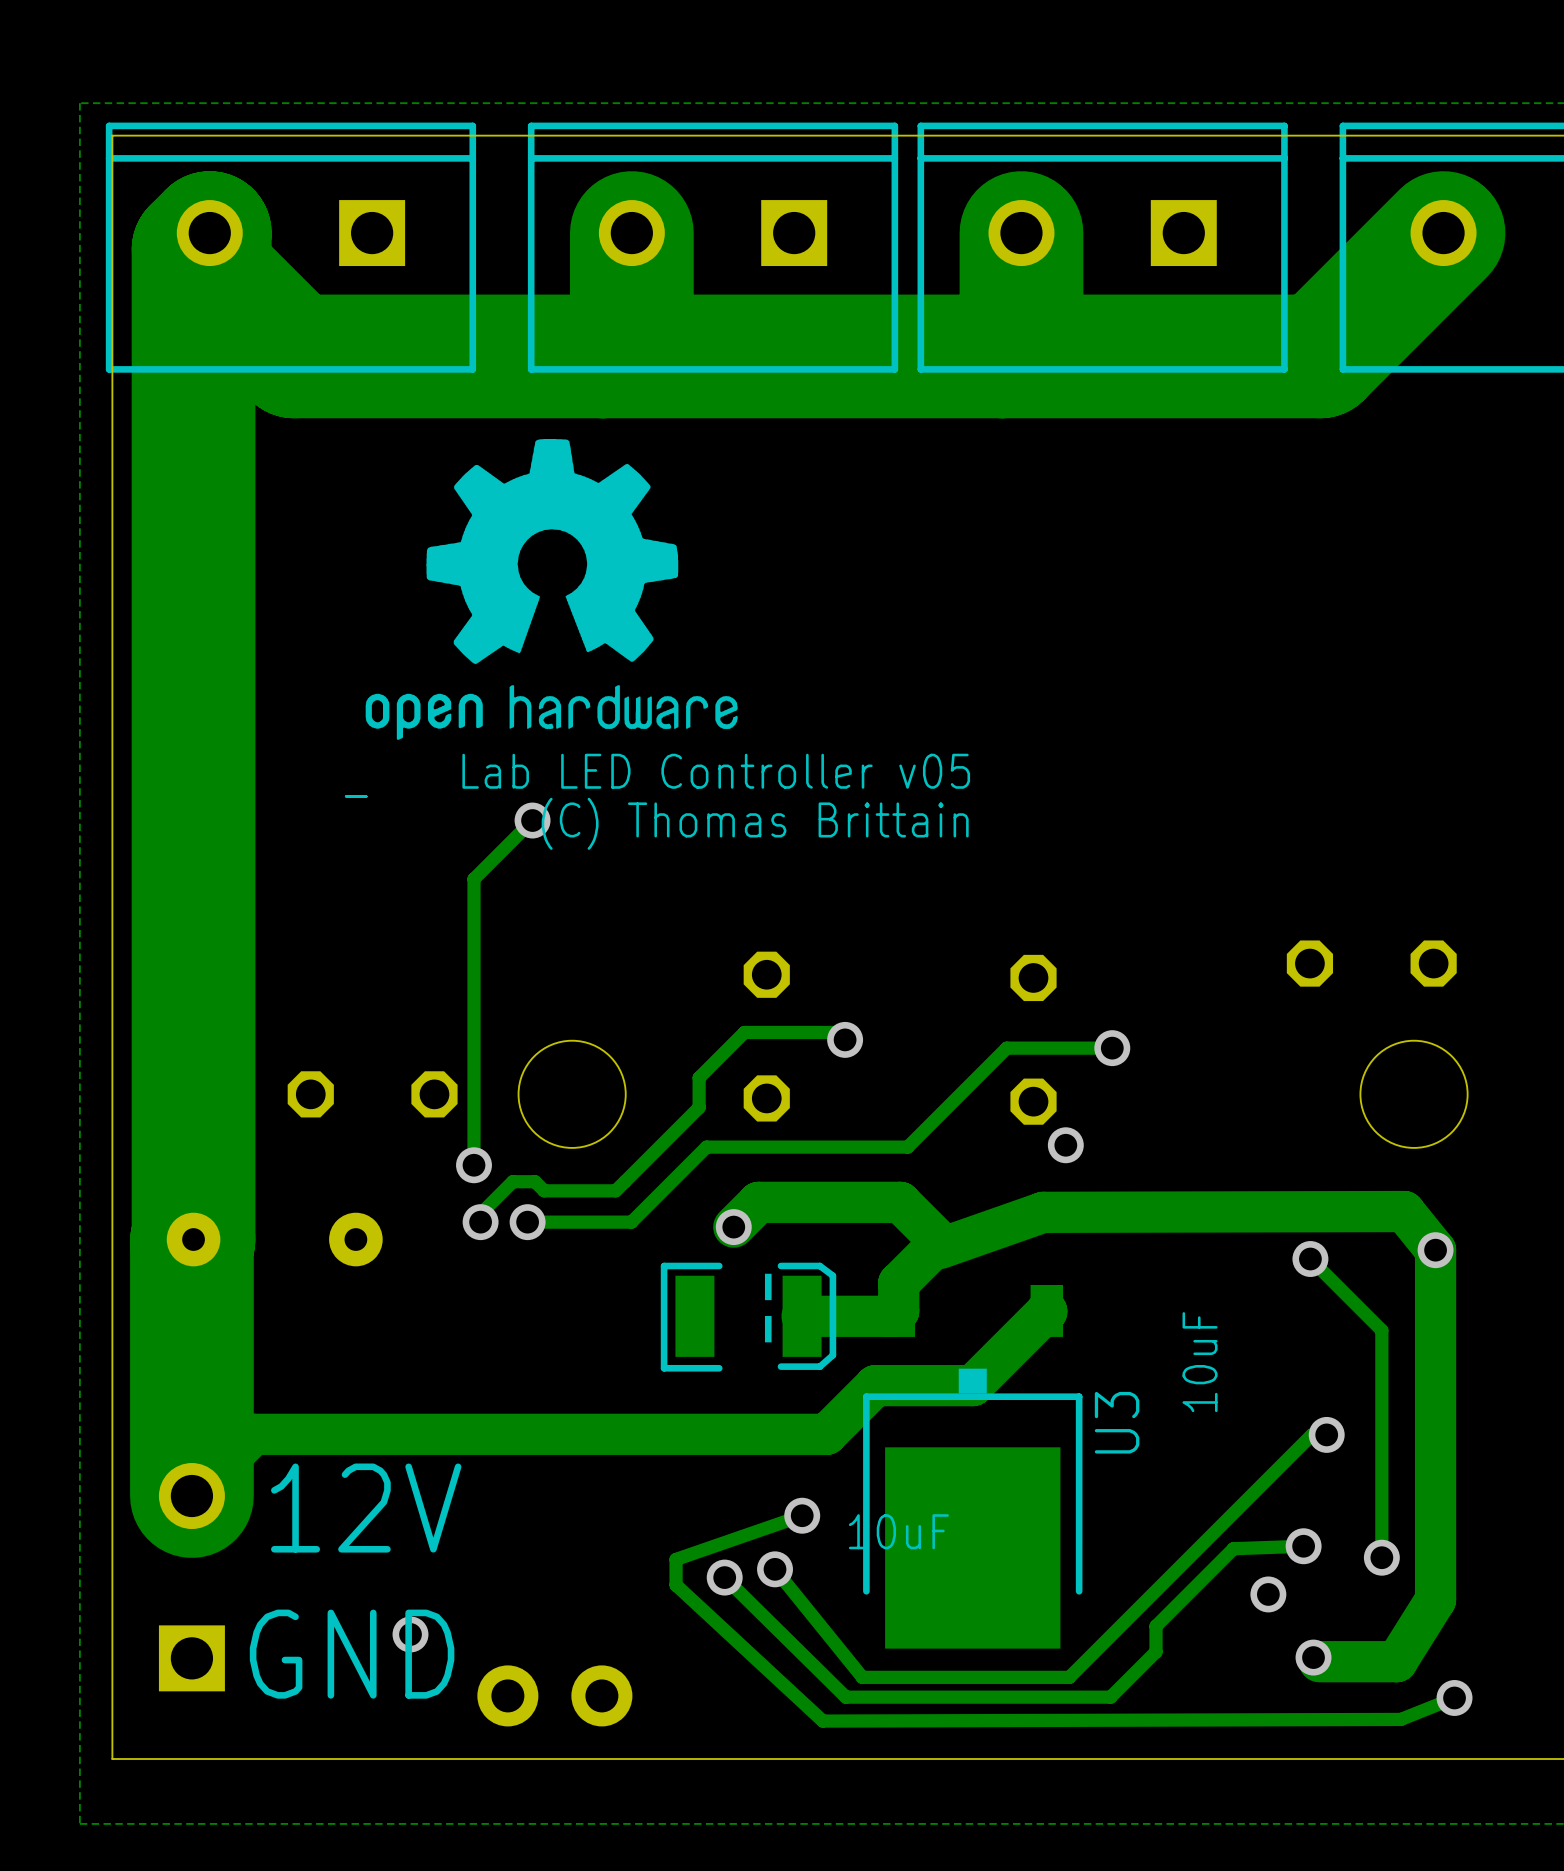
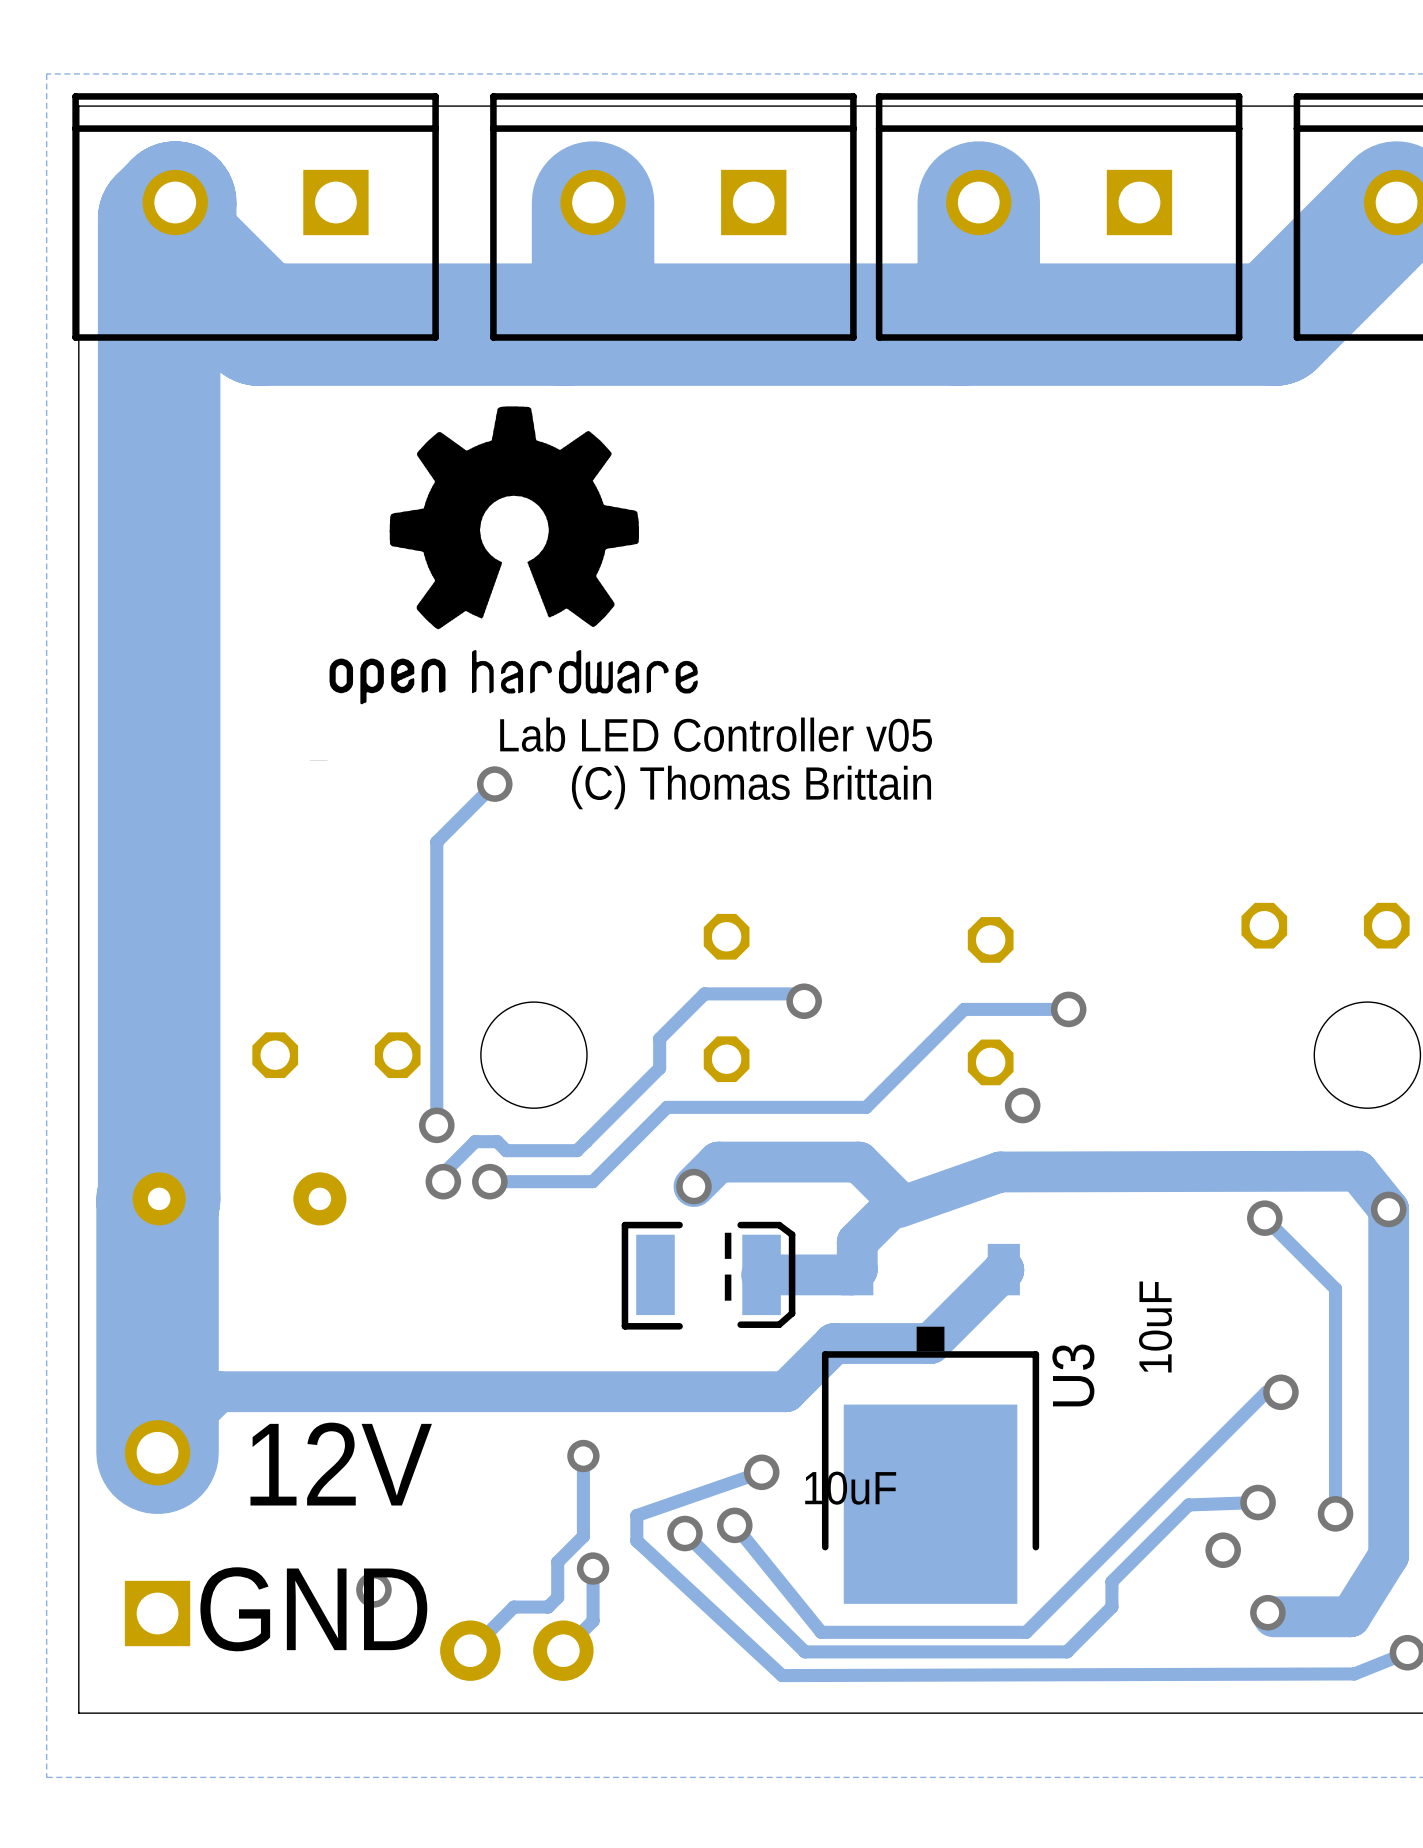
track: none -> (583, 1456) (583, 1536) (557, 1562) (557, 1597) (548, 1607) (513, 1607) (470, 1650)
via: none -> (583, 1456)
track: none -> (593, 1568) (593, 1621) (563, 1650)
via: none -> (593, 1568)

